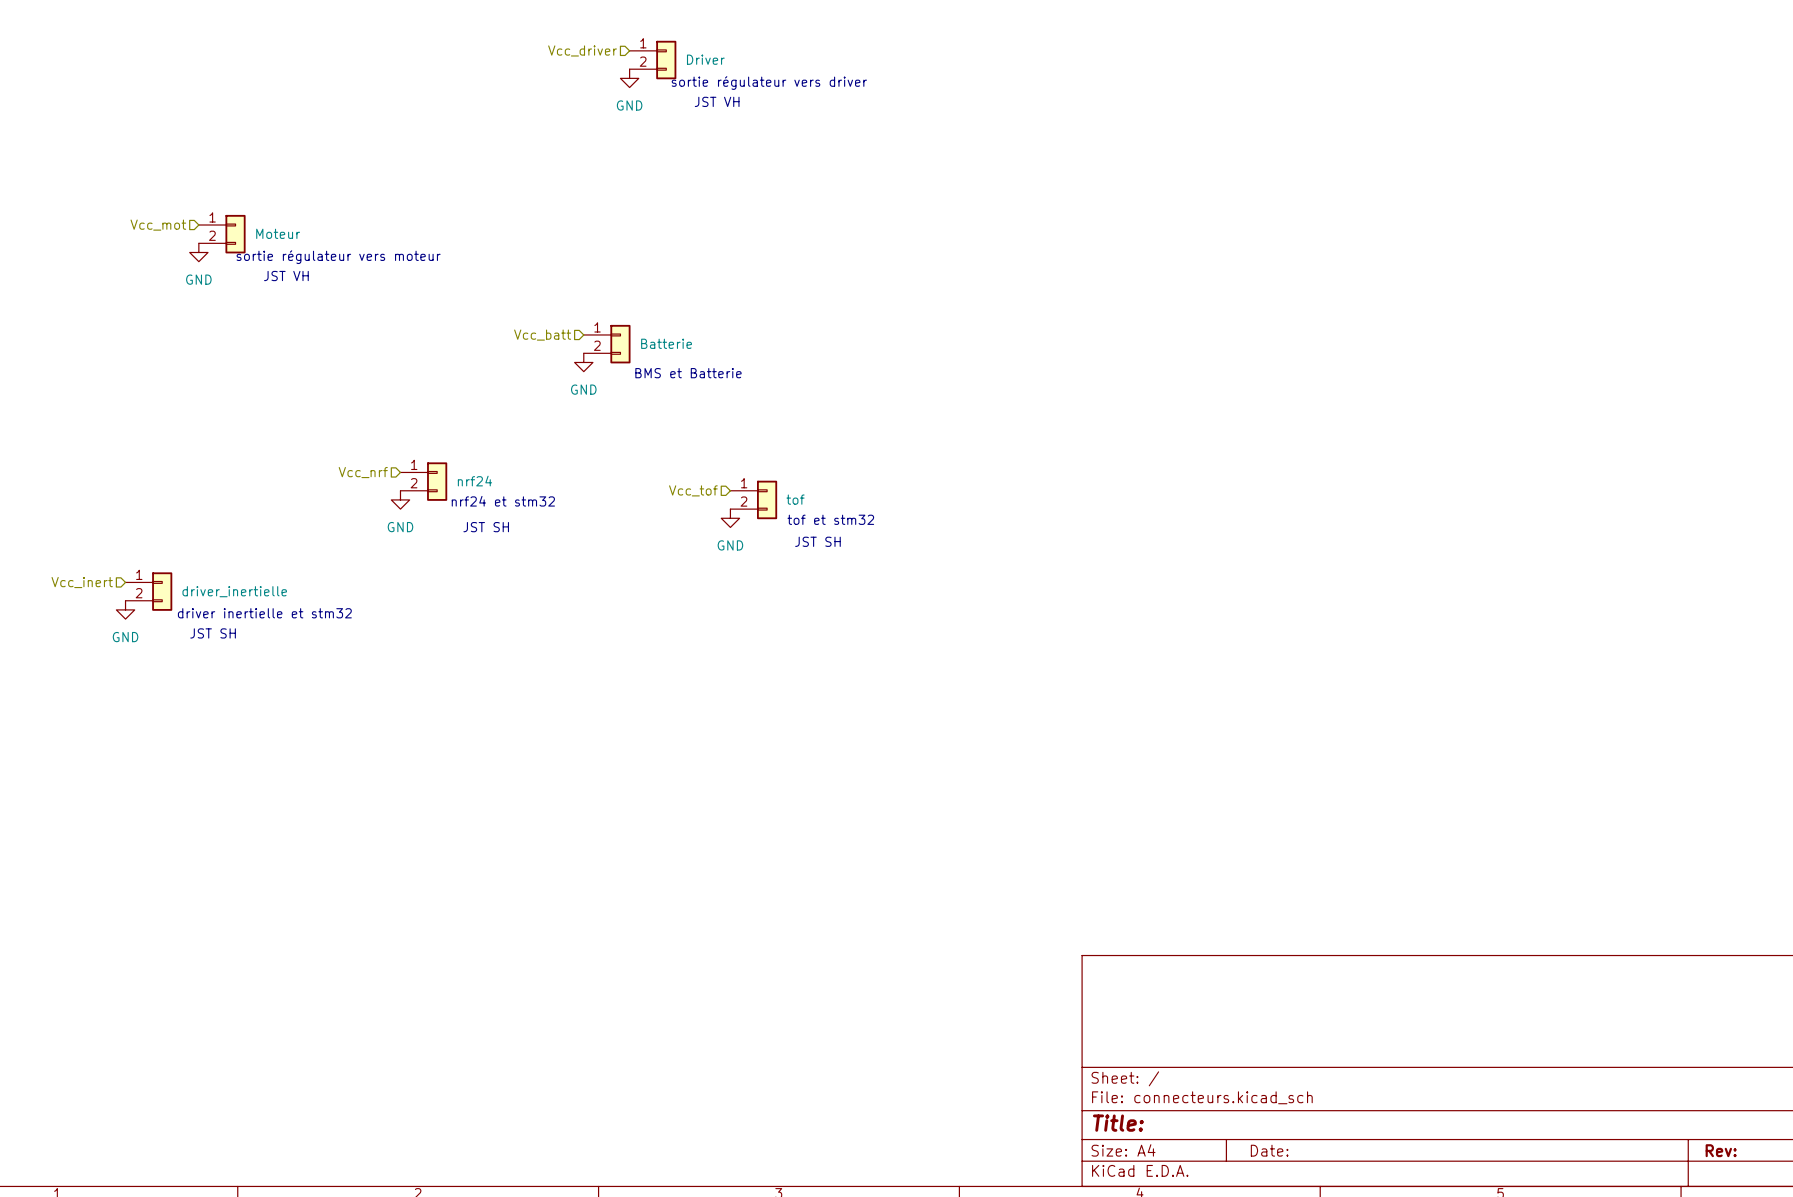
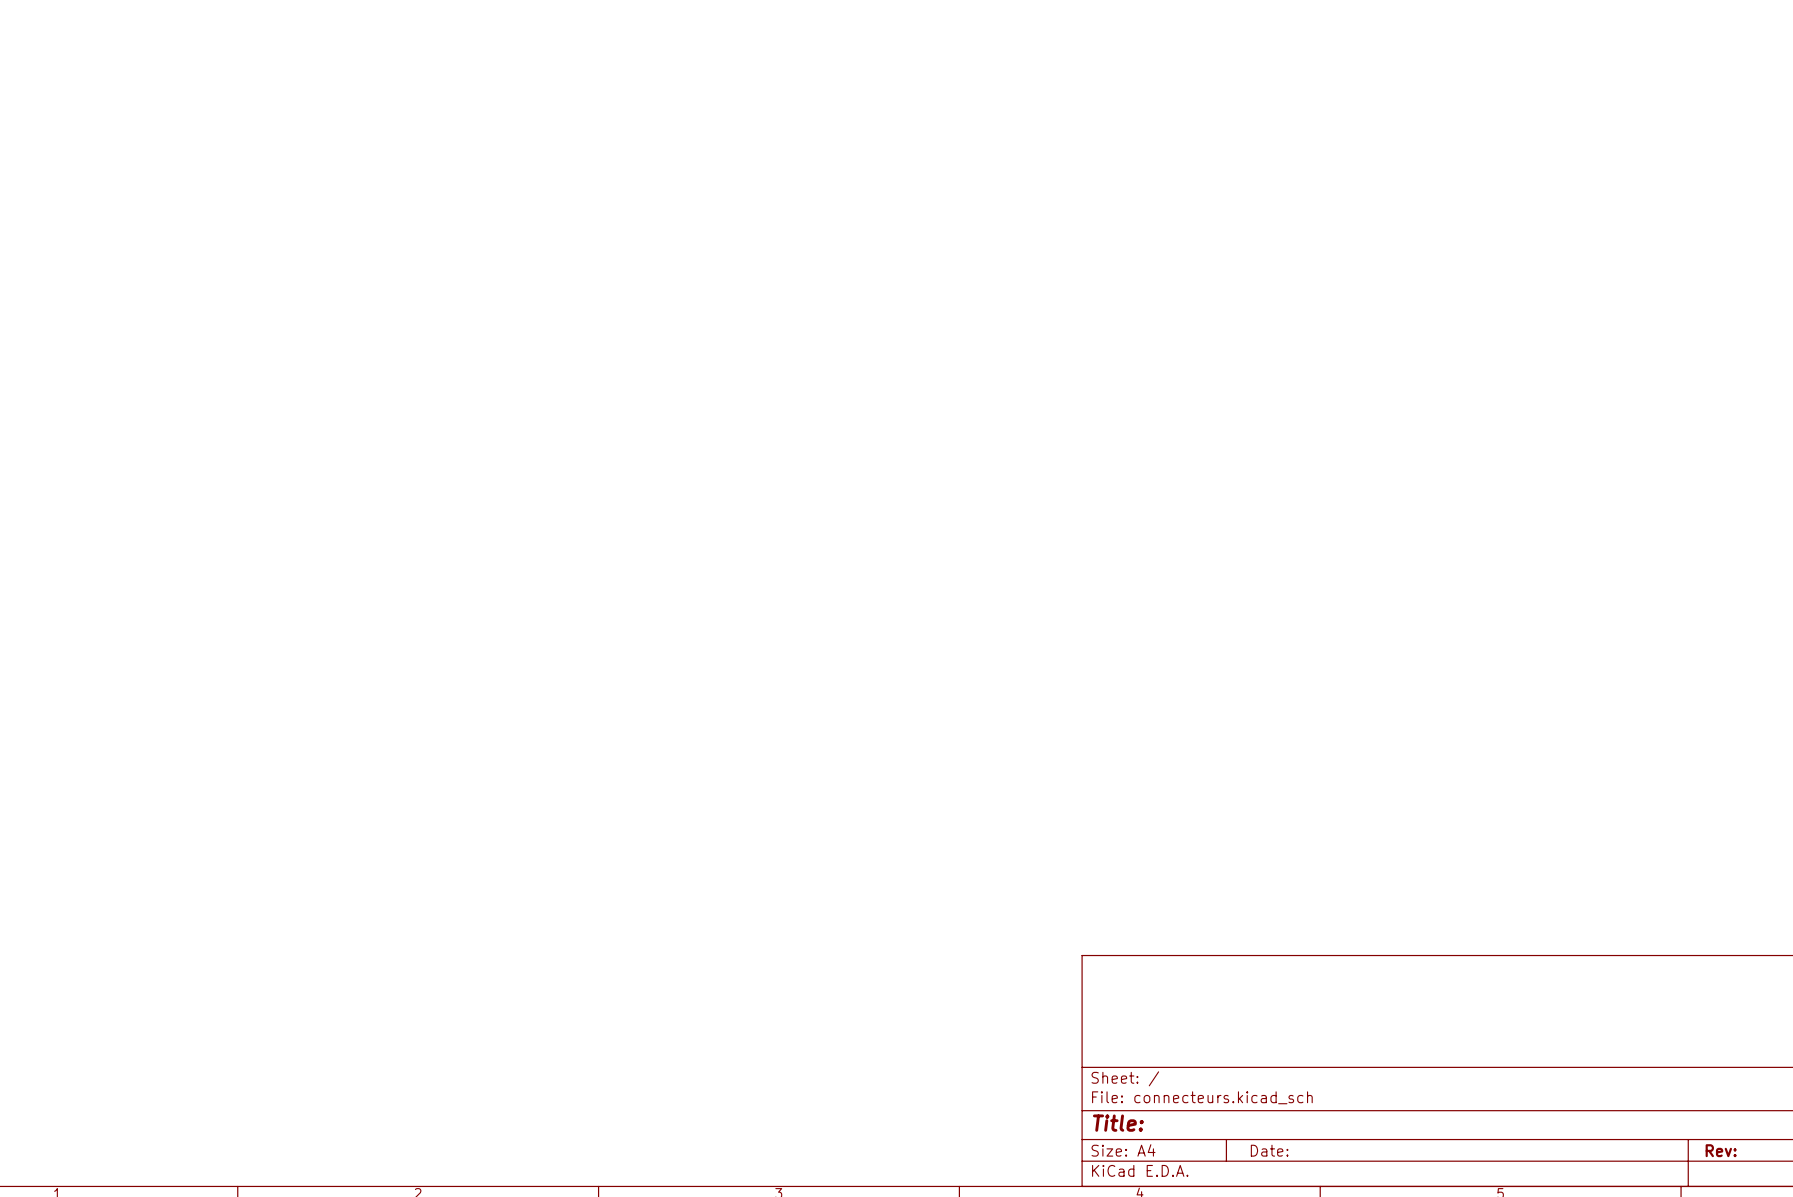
hierarchical label: Vcc_driver (582, 50) -> none
Driver: (652, 60) -> none
power symbol: GND (629, 78) -> none
text: sortie régulateur vers driver (769, 83) -> none
text: JST VH (717, 101) -> none
hierarchical label: Vcc_mot (158, 225) -> none
Moteur: (222, 234) -> none
power symbol: GND (198, 252) -> none
text: sortie régulateur vers moteur (338, 257) -> none
text: JST VH (286, 276) -> none
hierarchical label: Vcc_batt (542, 335) -> none
Batterie: (607, 344) -> none
power symbol: GND (583, 362) -> none
text: BMS et Batterie (688, 373) -> none
hierarchical label: Vcc_nrf (363, 472) -> none
nrf24: (423, 481) -> none
hierarchical label: Vcc_tof (693, 490) -> none
power symbol: GND (400, 499) -> none
tof: (753, 499) -> none
text: nrf24 et stm32 (503, 501) -> none
power symbol: GND (730, 518) -> none
text: tof et stm32 (830, 519) -> none
text: JST SH (486, 527) -> none
text: JST SH (817, 541) -> none
hierarchical label: Vcc_inert (82, 582) -> none
driver_inertielle: (148, 591) -> none
power symbol: GND (125, 609) -> none
text: driver inertielle et stm32 (264, 613) -> none
text: JST SH (213, 633) -> none

